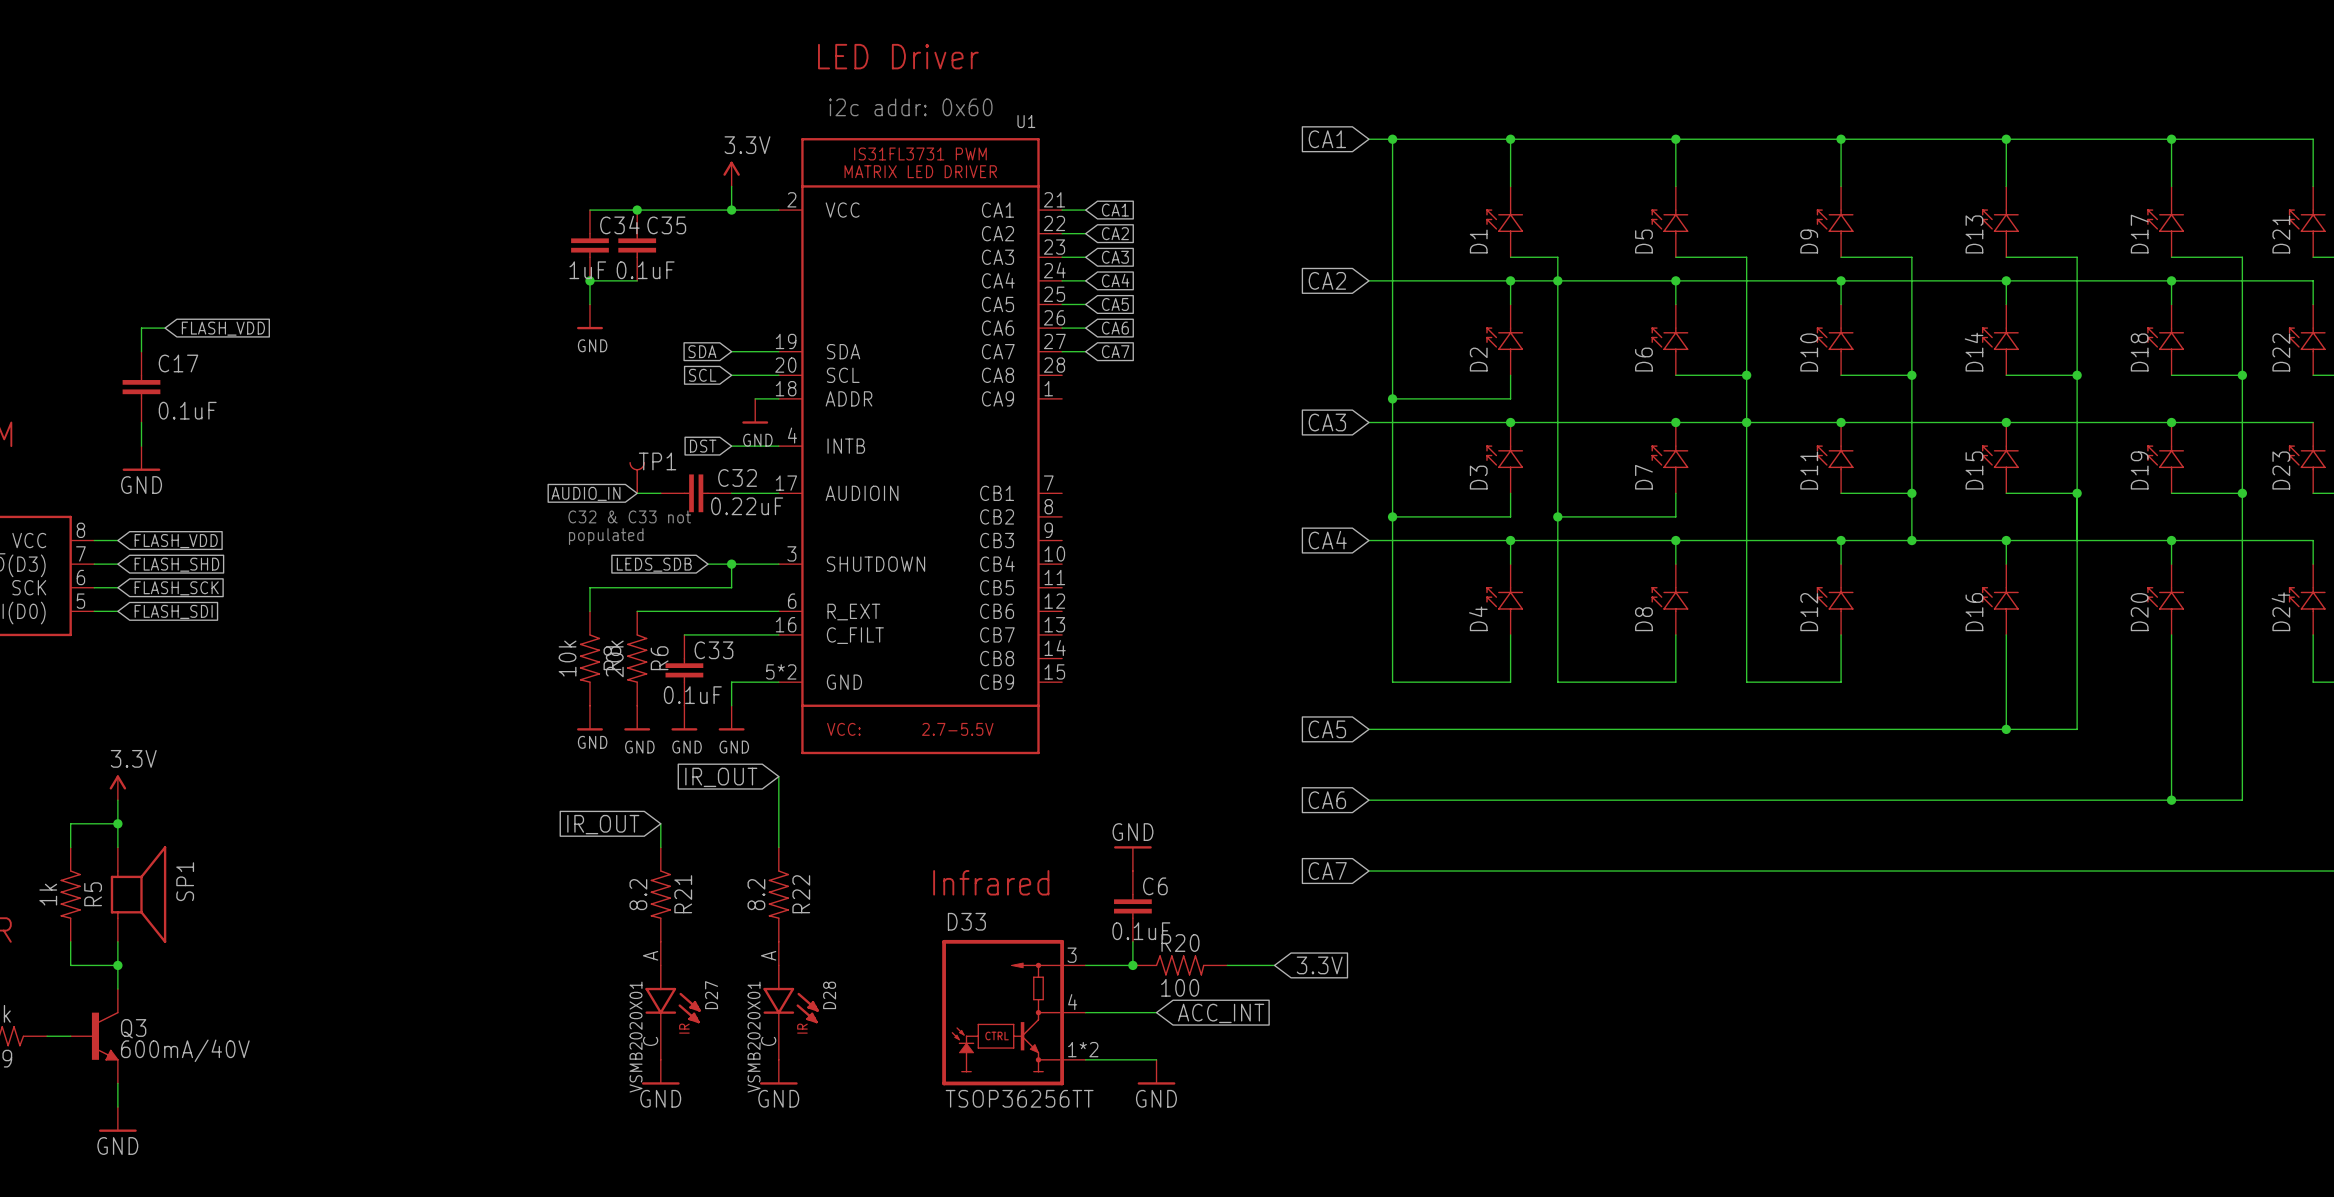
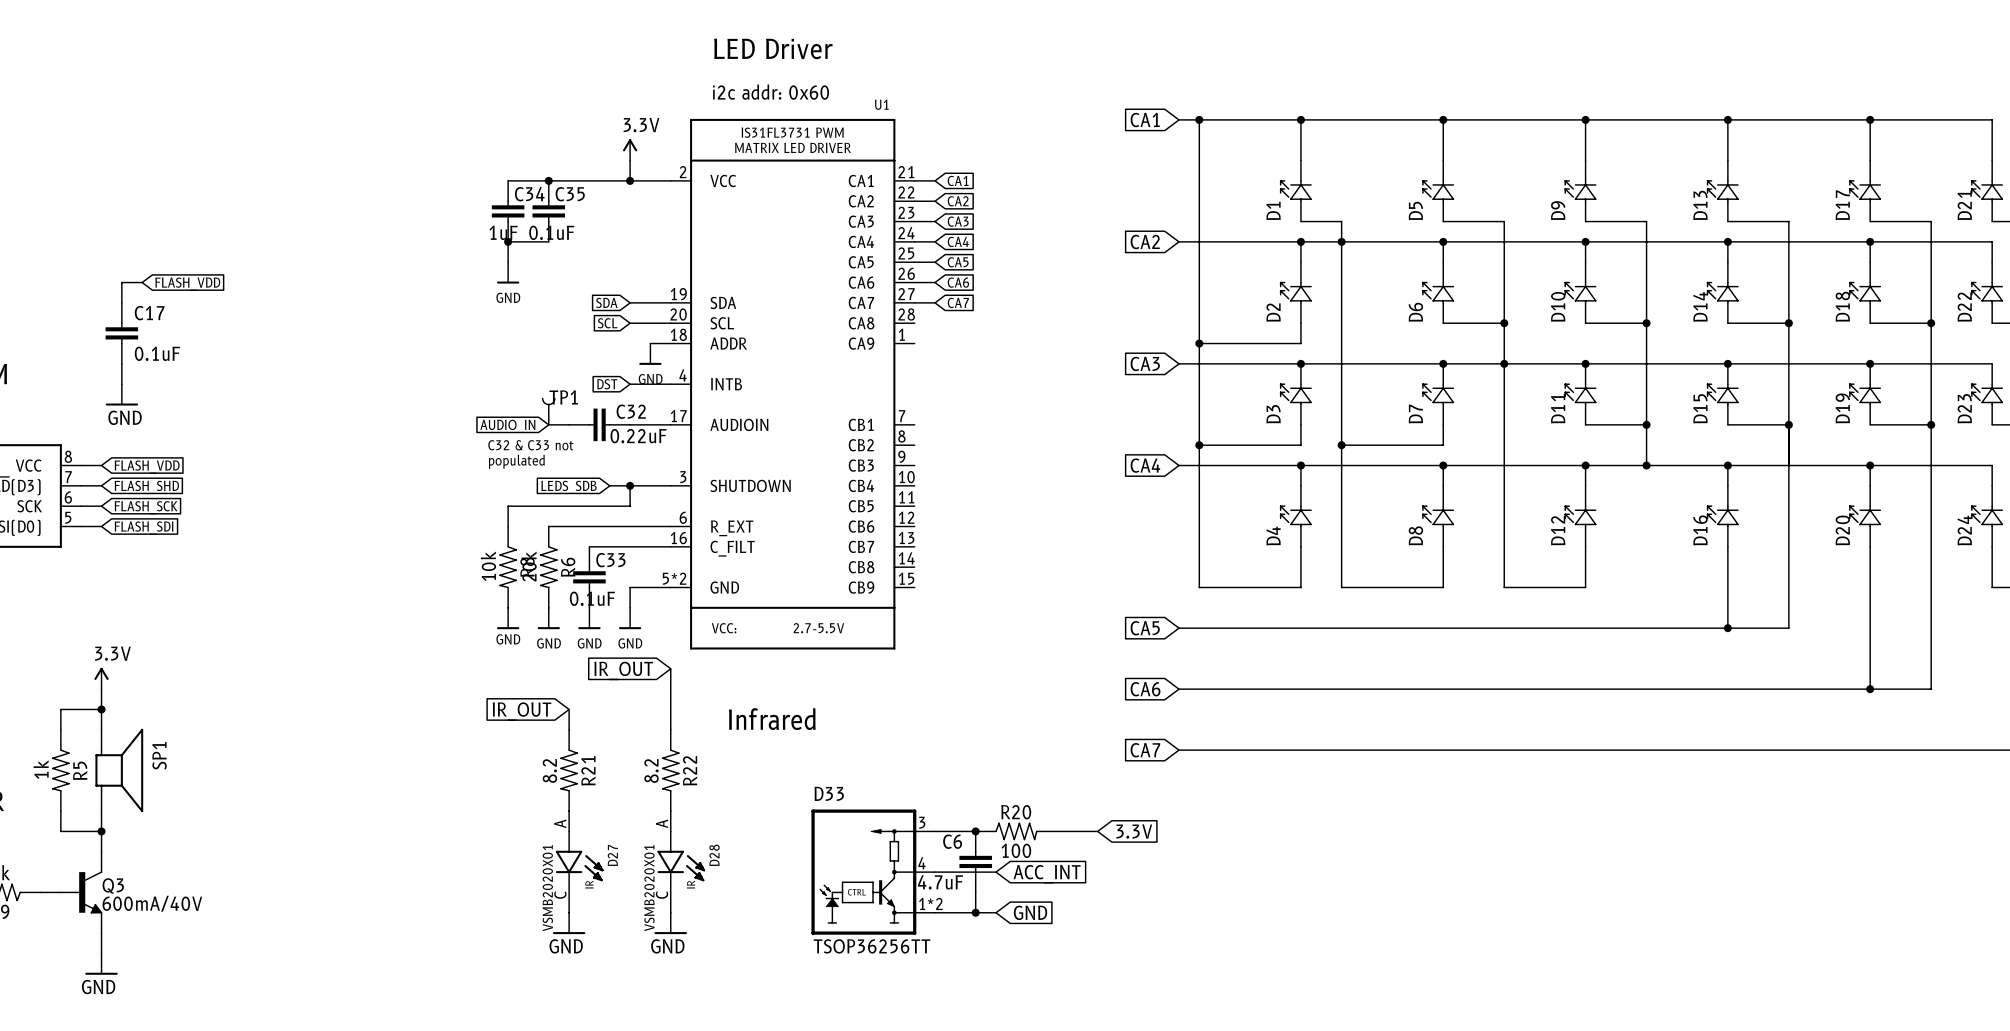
power symbol: GND (1132, 858) -> none
text position: Infrared (991, 882) -> Infrared (772, 719)
C6 name position: C6 (1155, 886) -> C6 (952, 841)
C6 position: (1132, 906) -> (975, 861)
C6 value: 0.1uF (1141, 931) -> 4.7uF (940, 882)
wire: (1132, 941) (1132, 965) -> (975, 892) (975, 912)
junction: none -> (975, 912)
global label: none -> GND (1030, 912)
power symbol: GND (1156, 1072) -> none

